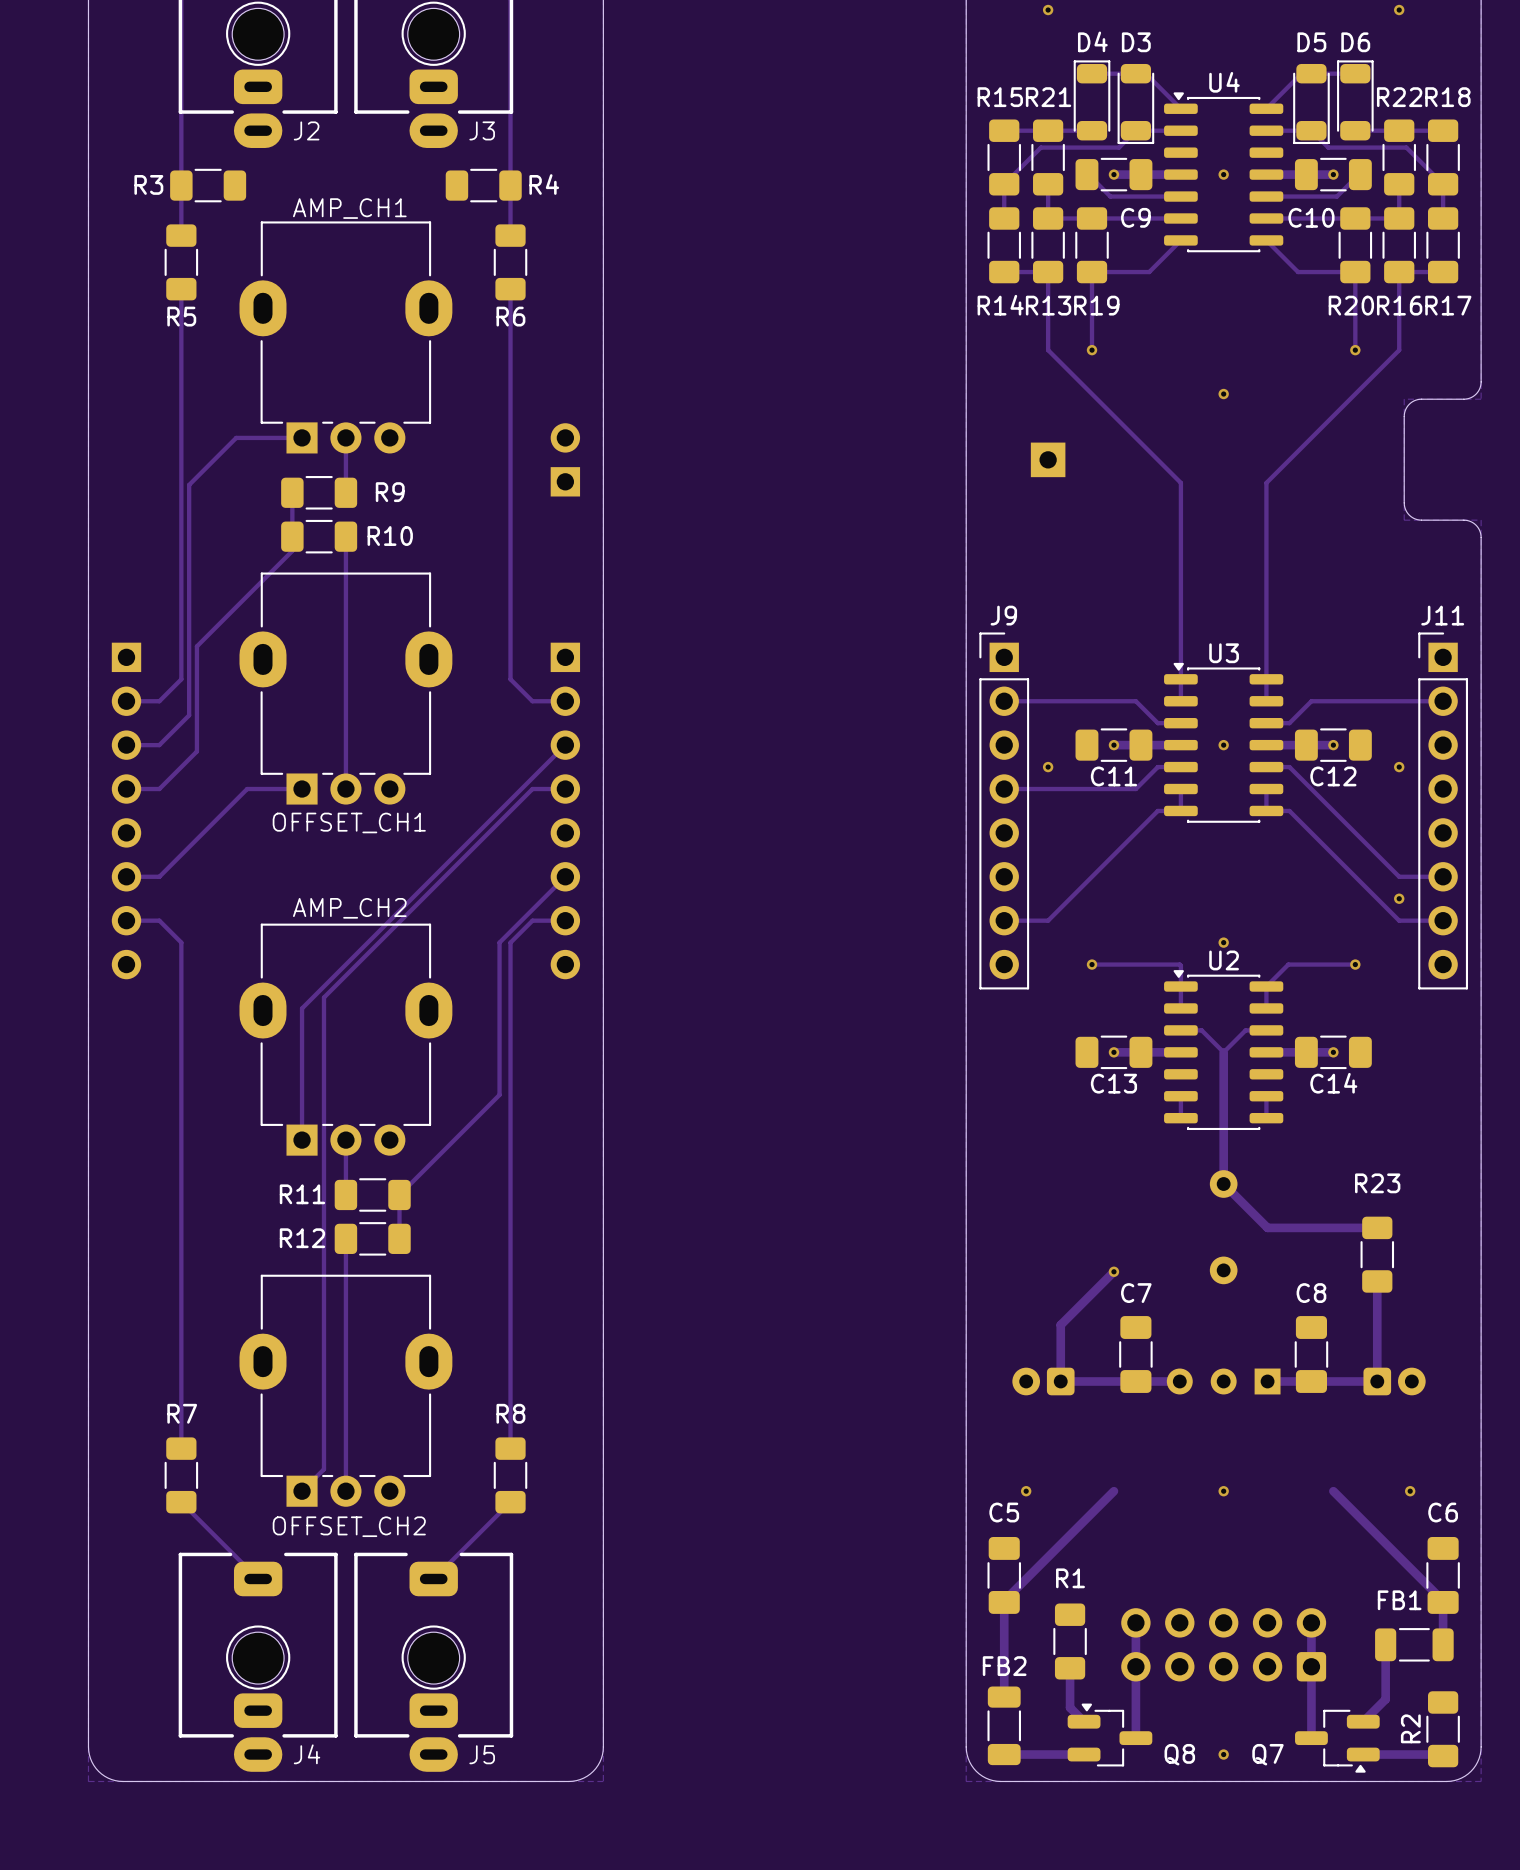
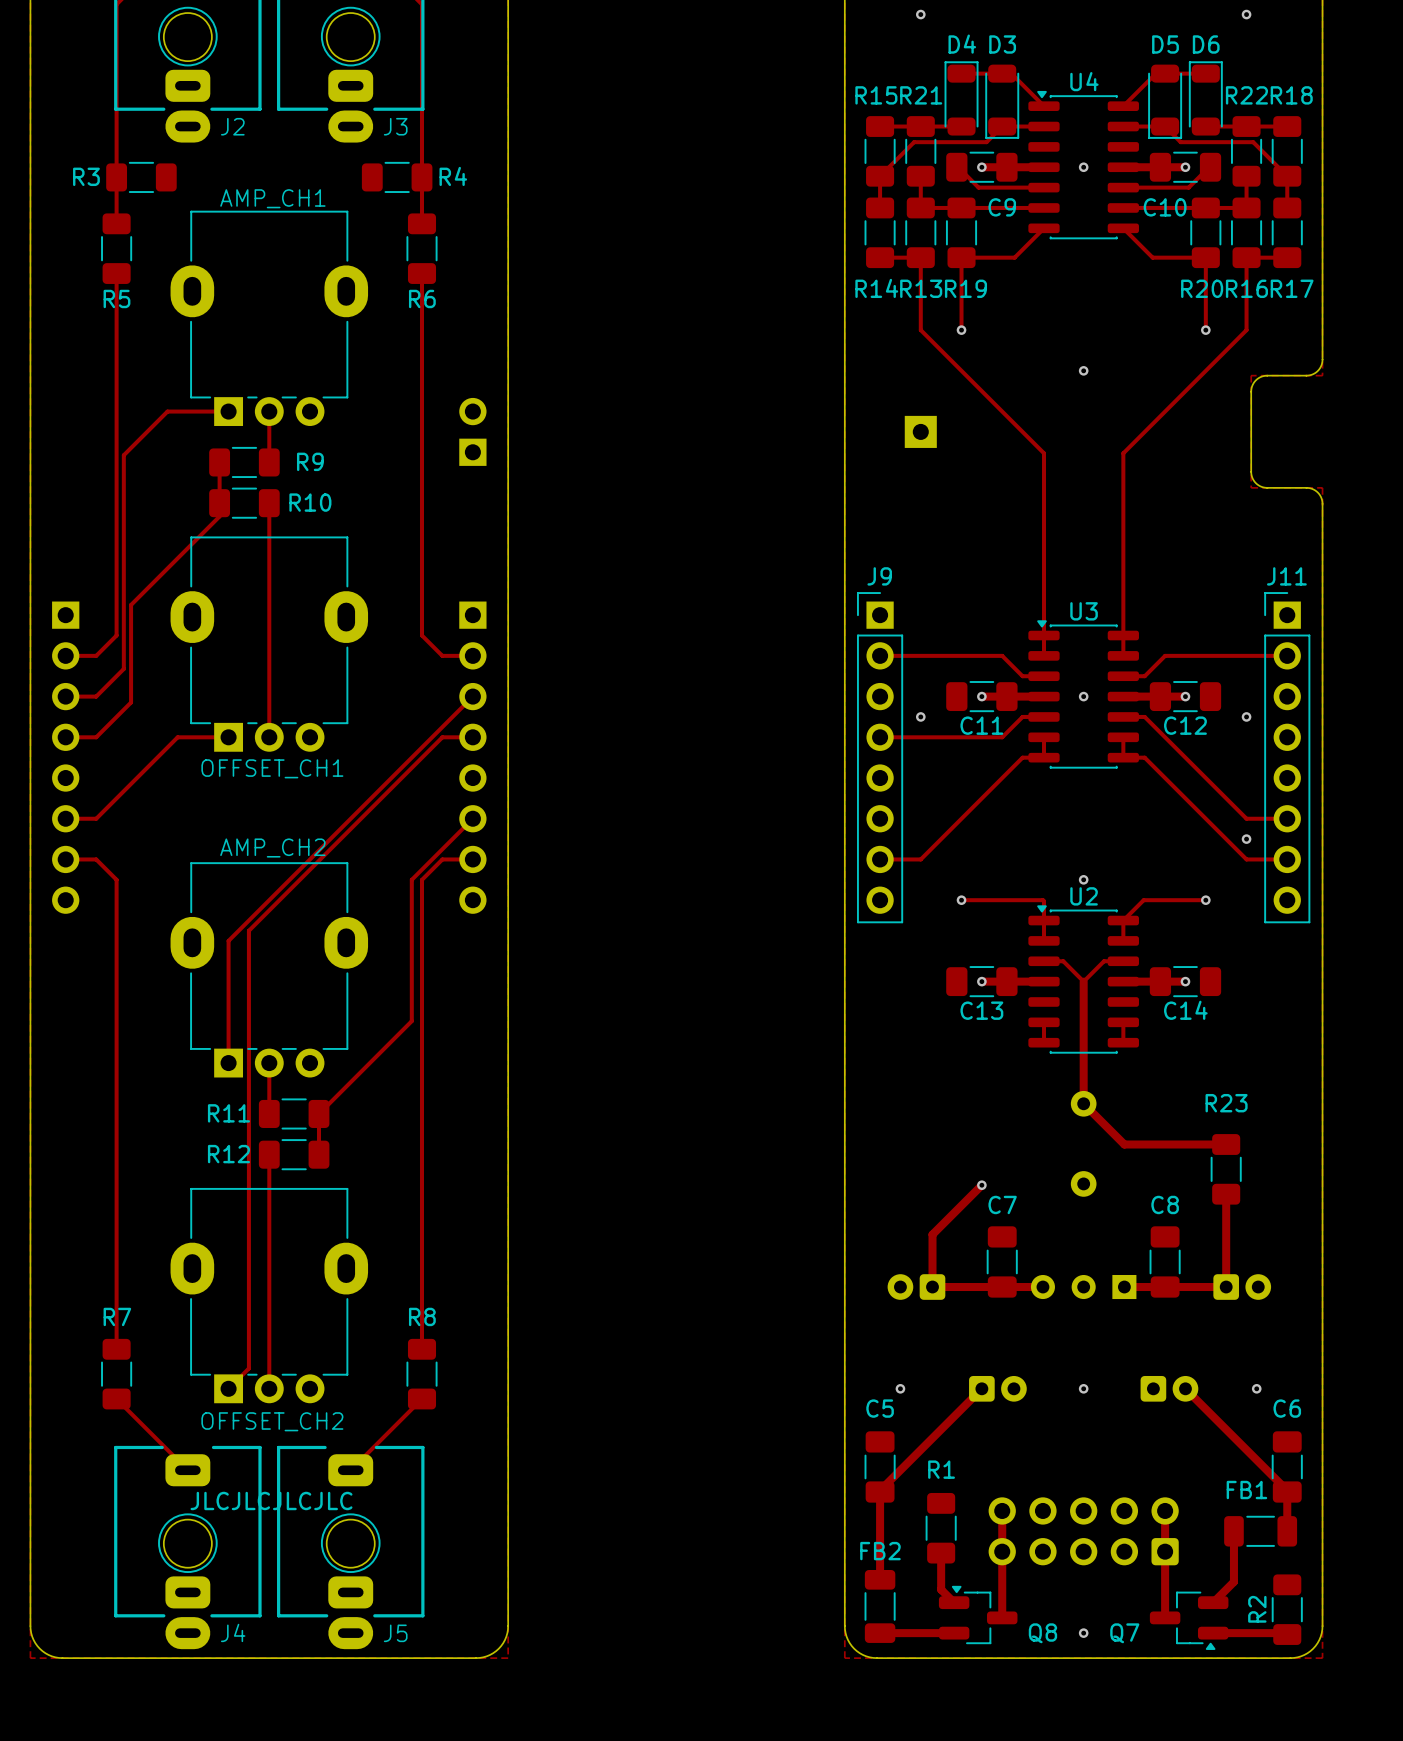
part: none -> (997, 1388)
part: none -> (1169, 1388)
text: none -> JLCJLCJLCJLC (271, 1500)

